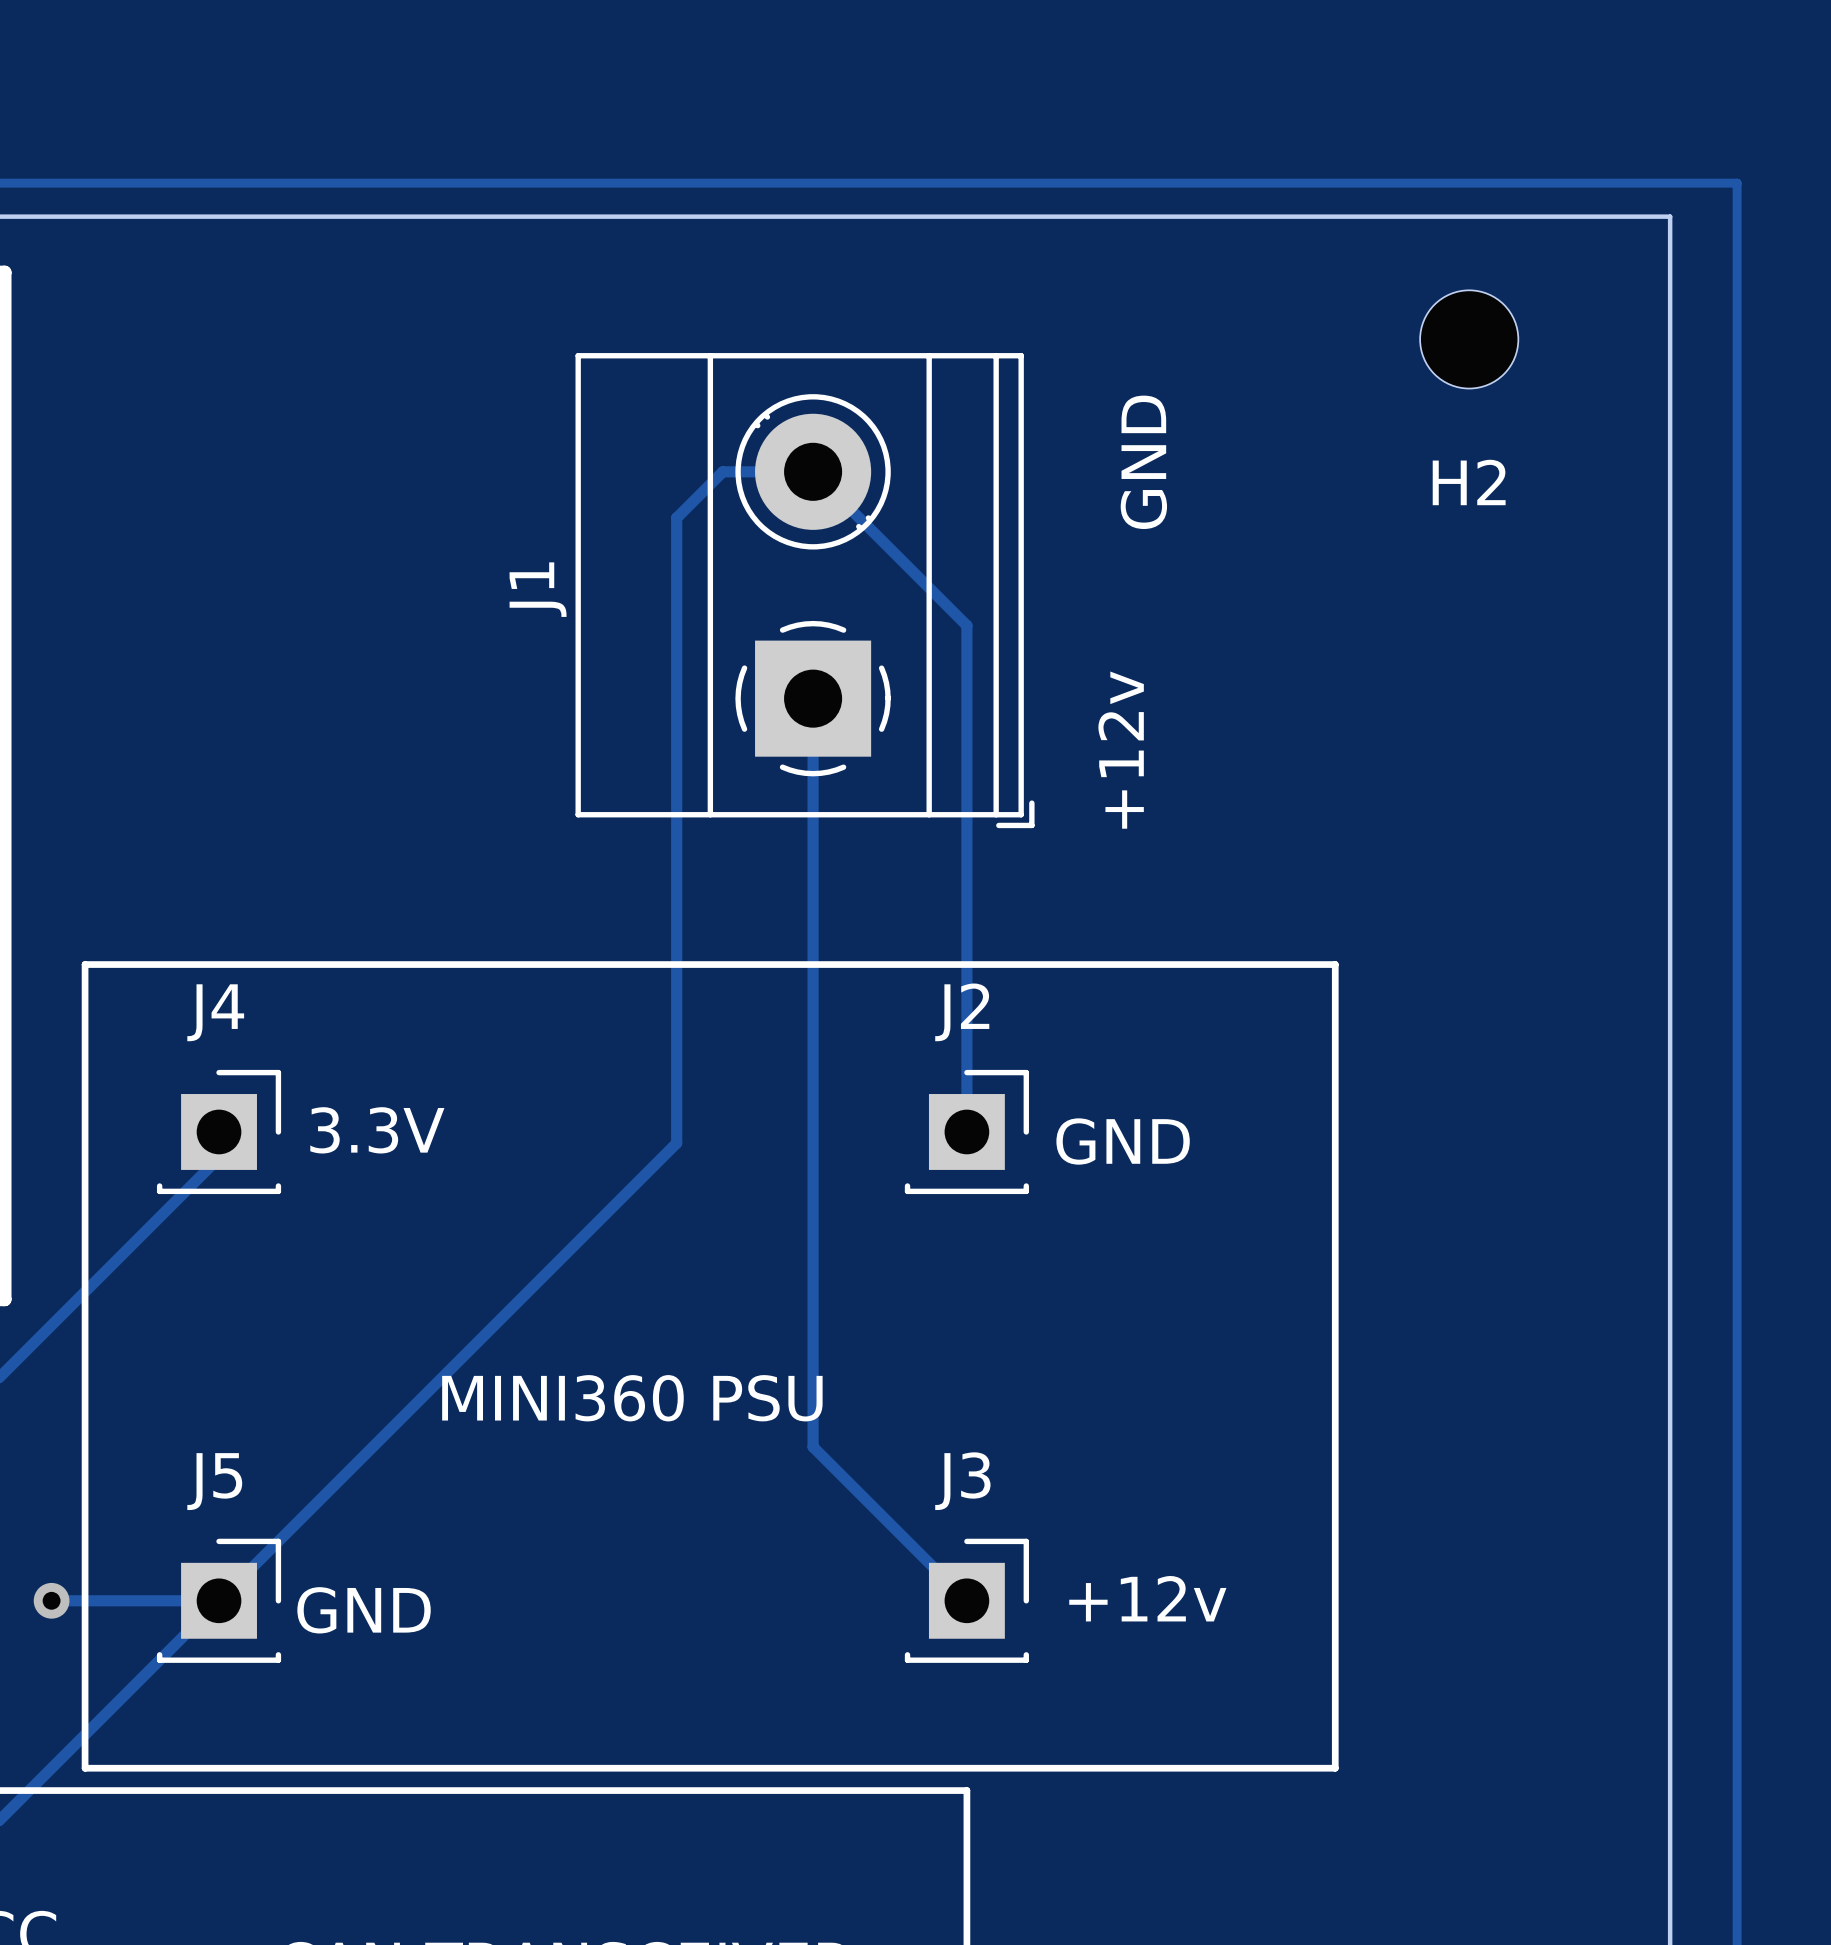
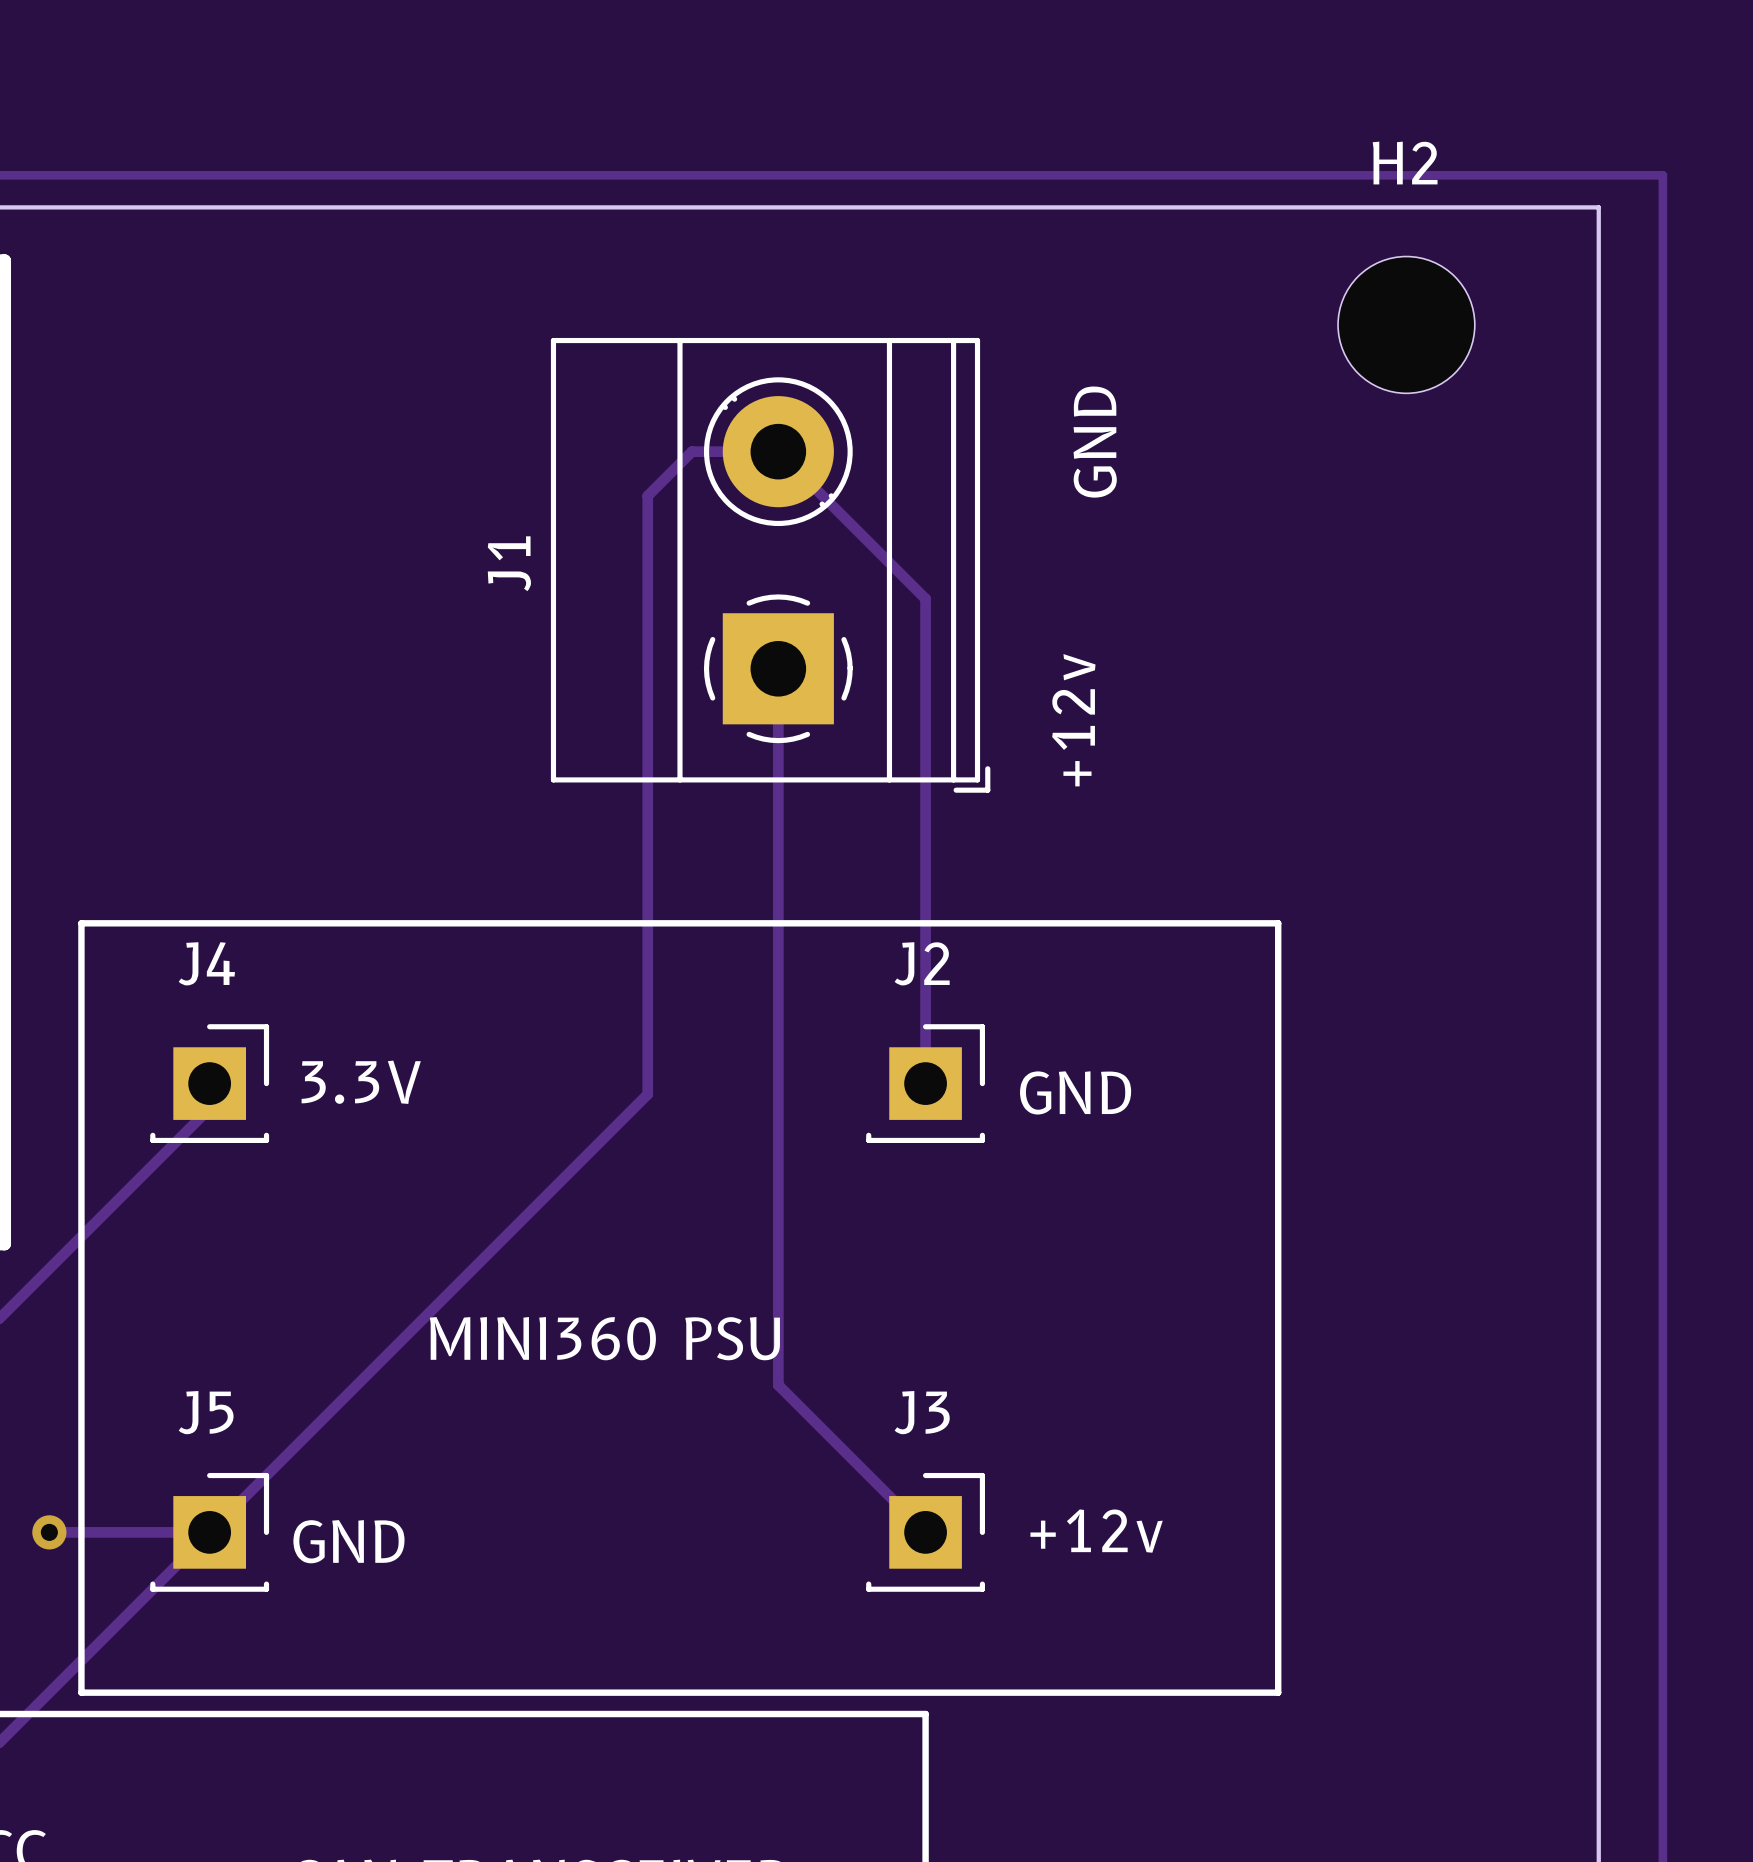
H2 footprint: [1420, 290, 1519, 389] -> [1338, 256, 1475, 394]
H2 name position: H2 (1469, 482) -> H2 (1405, 163)

